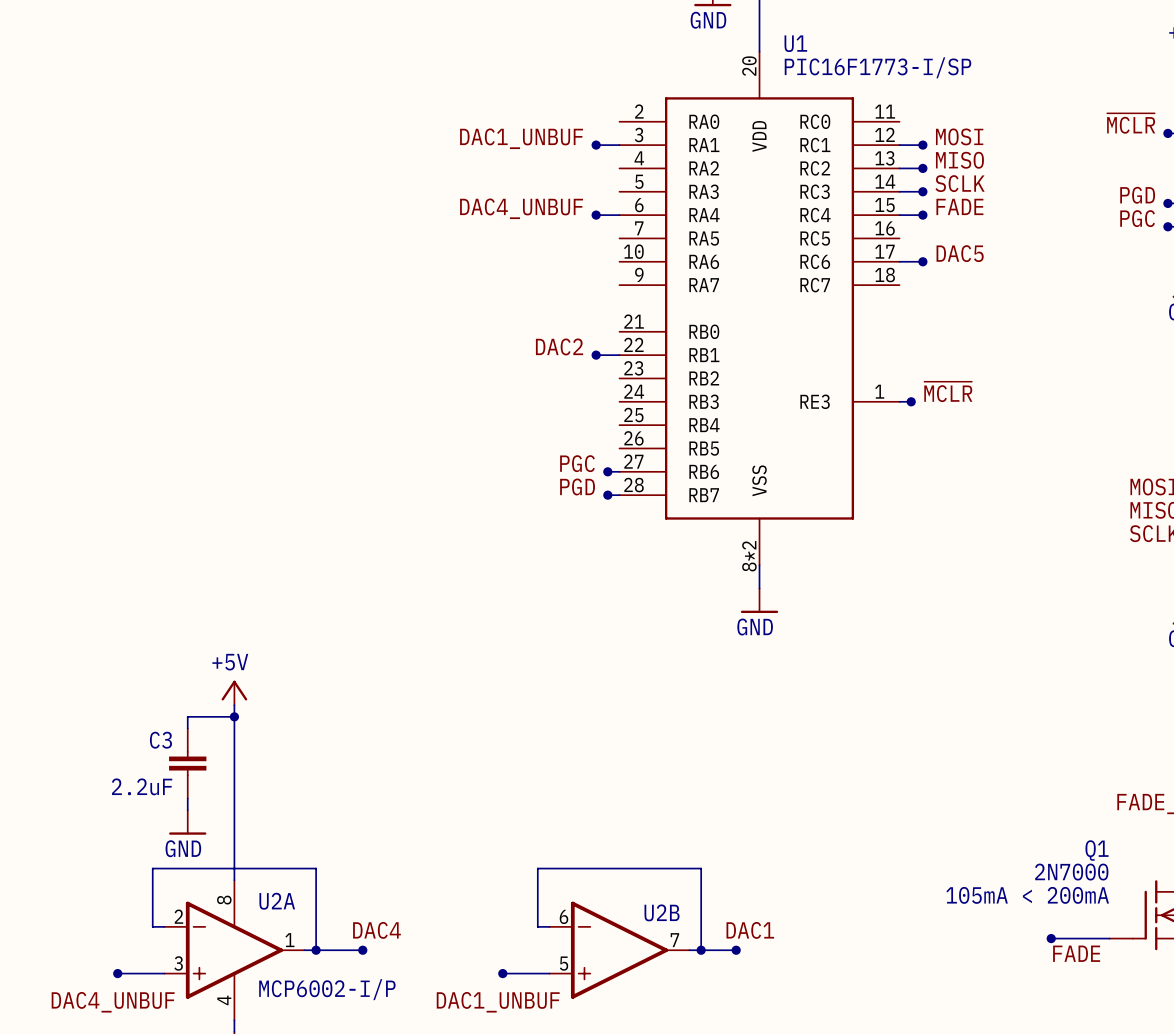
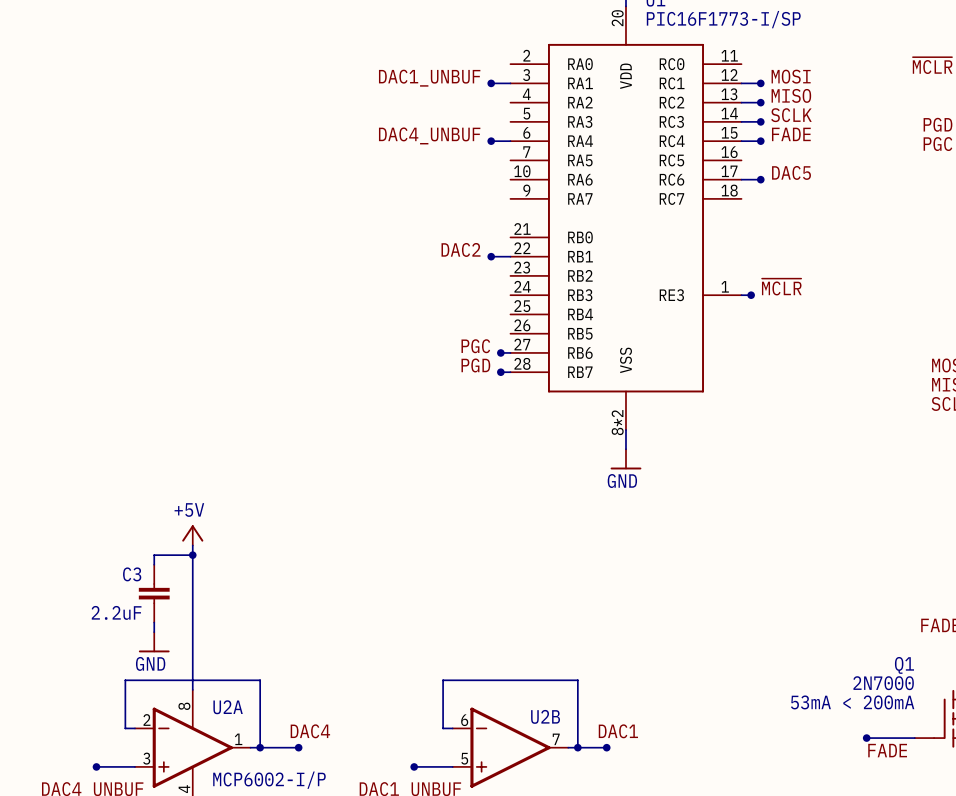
text: 105mA < 200mA (1027, 895) -> 53mA < 200mA (852, 702)

